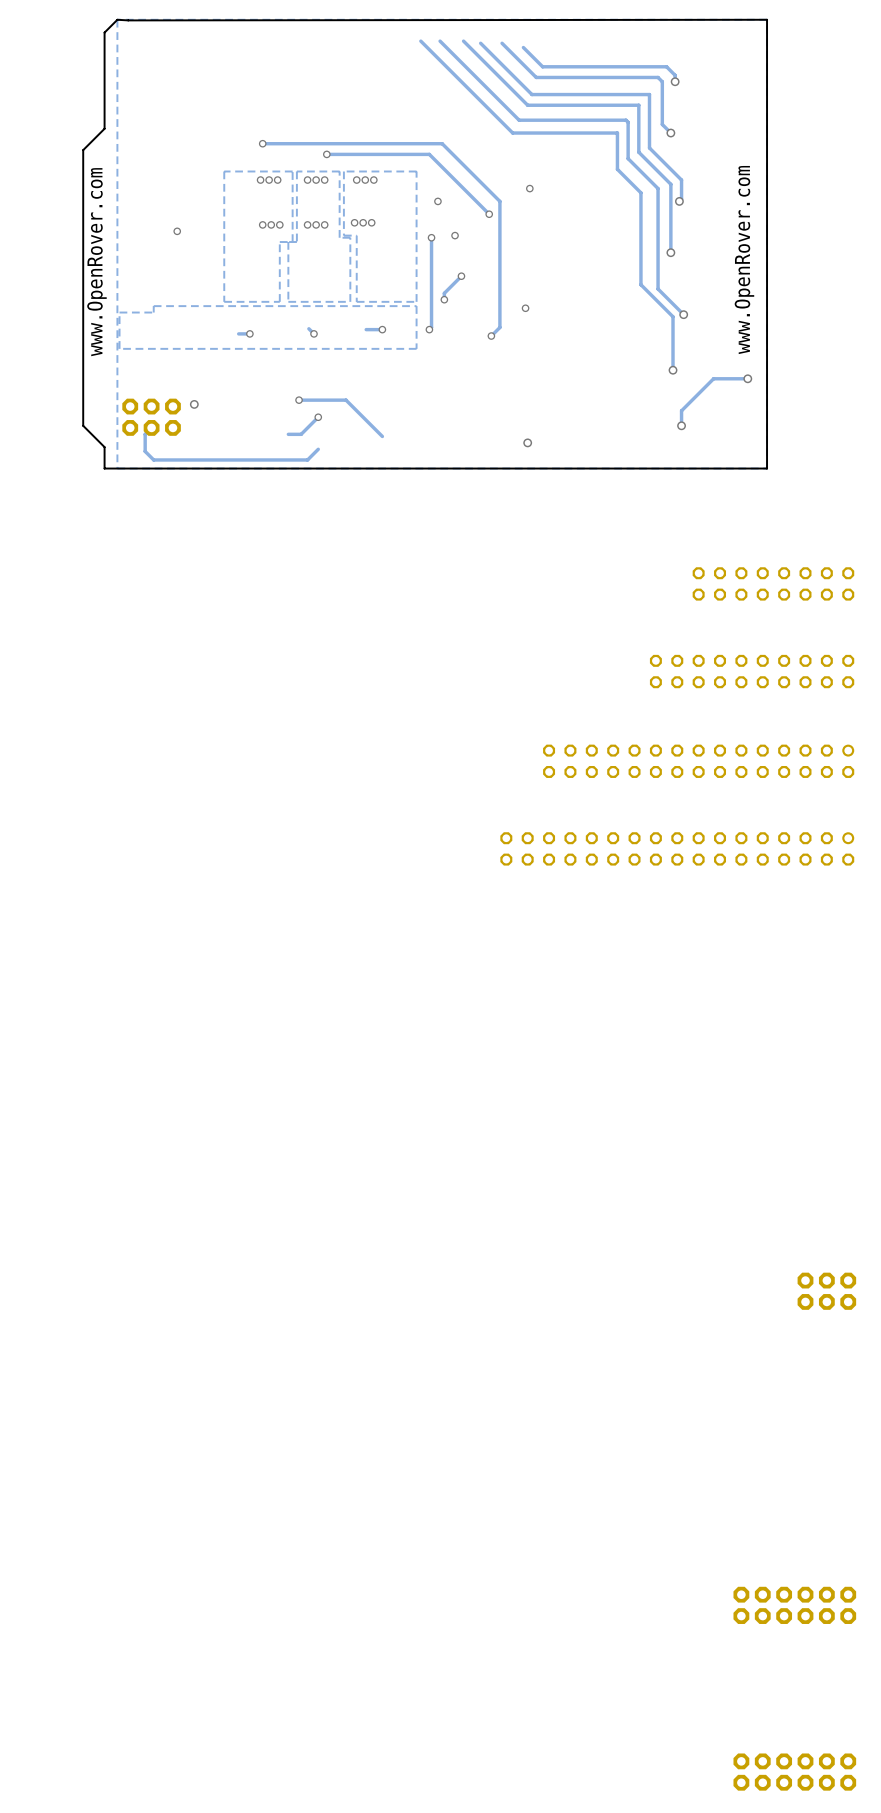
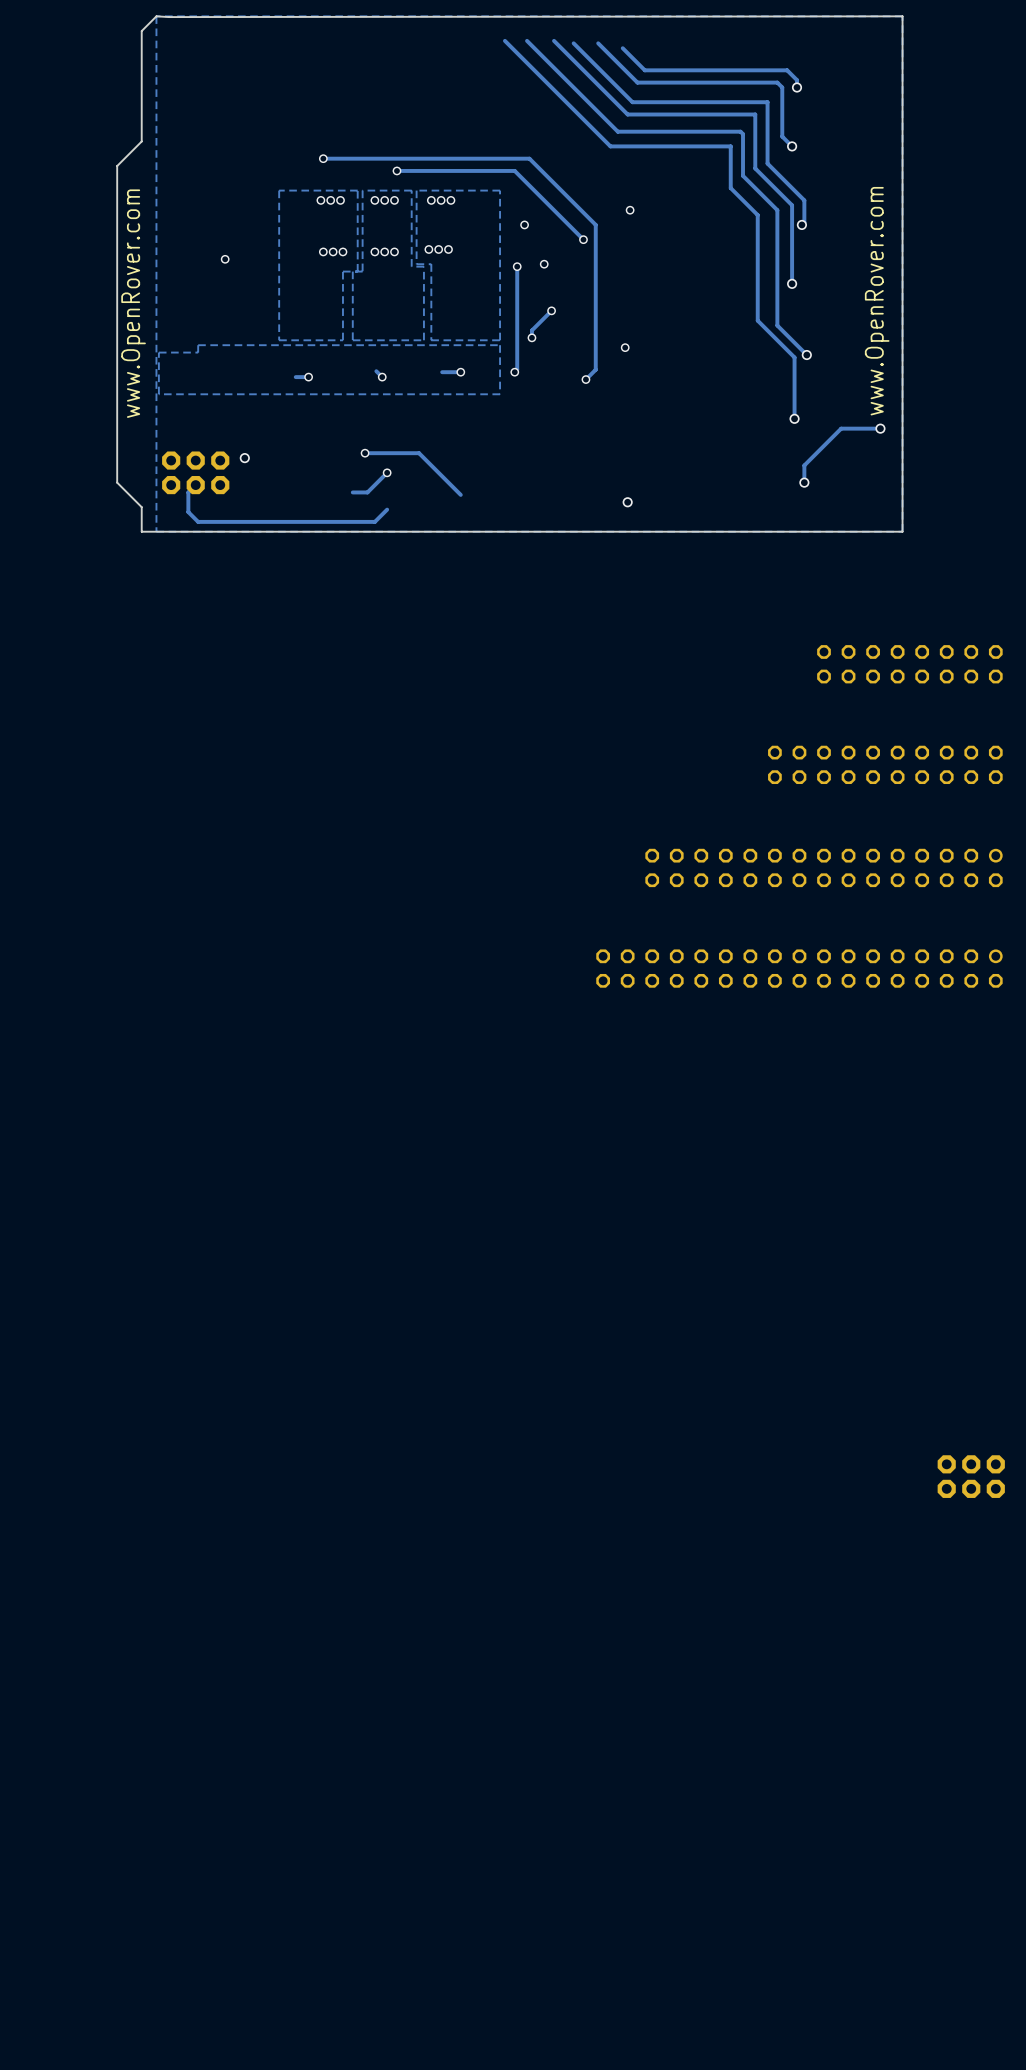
part: (794, 1605) -> none
part: (794, 1772) -> none

